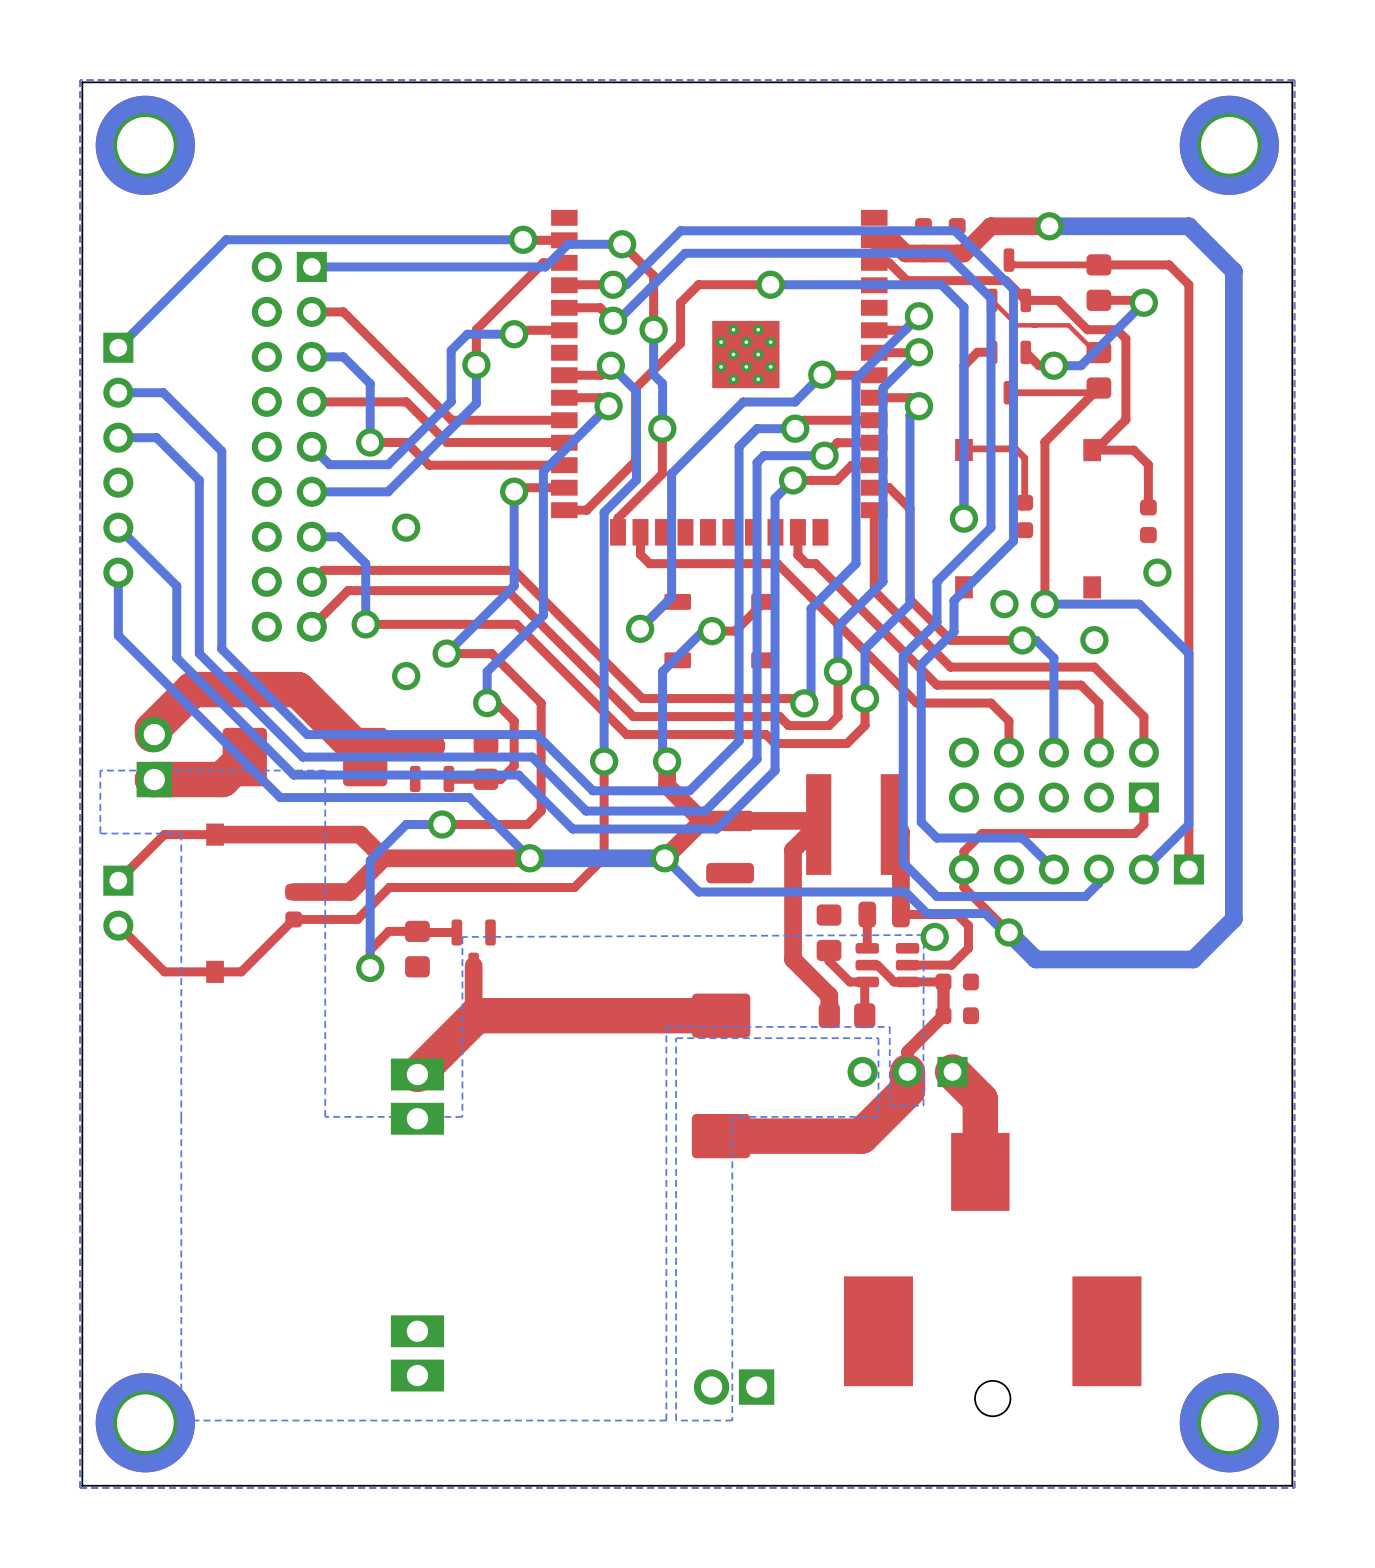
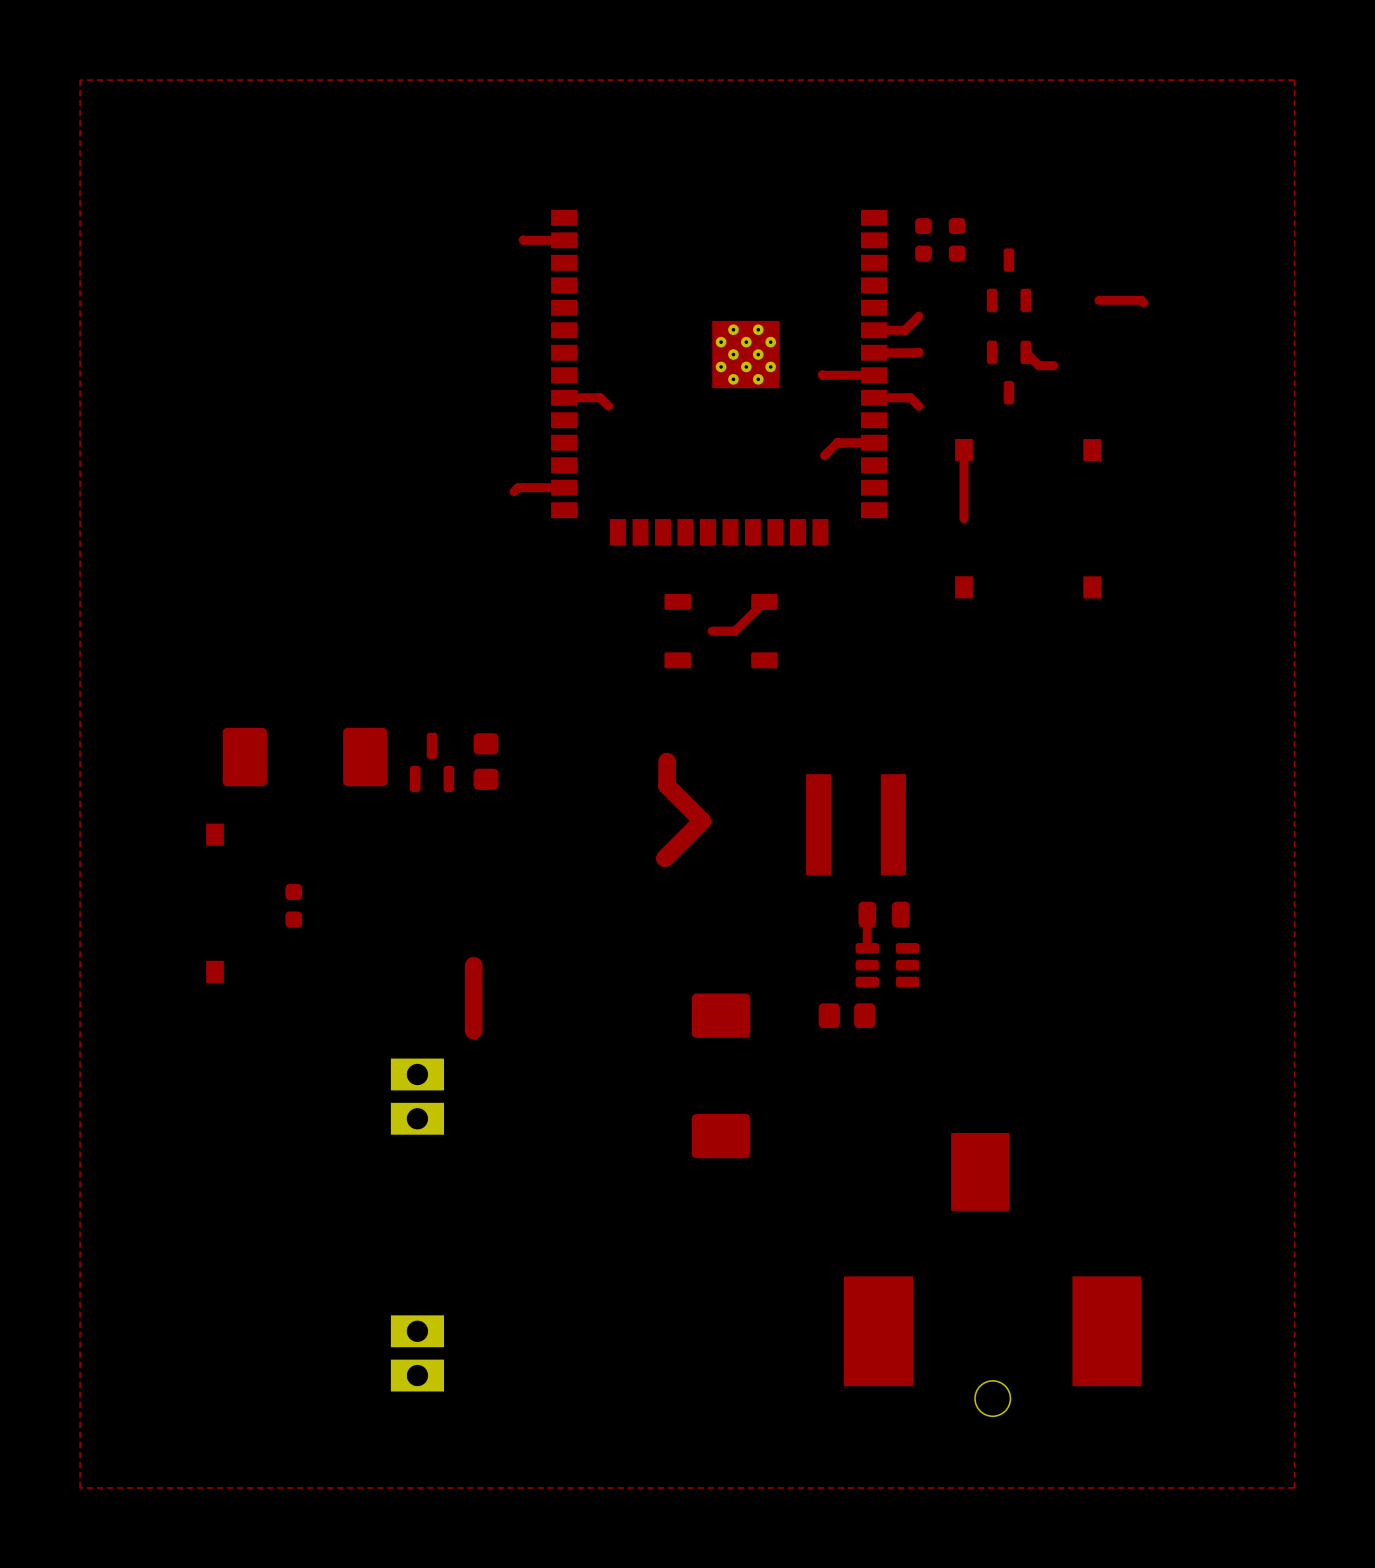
bottom zone outline: (1294, 80) (80, 80) (80, 1488) (1294, 1488) (1294, 80) -> none
board edge: (1292, 82) (82, 82) (82, 1485) (1292, 1485) (1292, 82) -> none
part: (145, 145) -> none
part: (1229, 145) -> none
top track: (1049, 226) (990, 226) (963, 253) (905, 253) (892, 240) (874, 240) -> none
bottom track: (1049, 226) (1188, 226) (1233, 271) (1233, 918) (1193, 959) (1035, 959) (1008, 932) (1004, 932) (985, 913) (927, 913) (905, 892) (698, 892) (664, 858) (529, 858) (469, 797) (280, 797) (118, 635) (118, 572) -> none
via: (1049, 226) -> none
bottom track: (523, 239) (226, 239) (118, 347) -> none
via: (523, 239) -> none
top track: (622, 244) (653, 275) (653, 329) -> none
bottom track: (622, 244) (568, 244) (545, 266) (311, 266) -> none
via: (622, 244) -> none
top track: (1008, 260) (1013, 264) (1169, 264) (1188, 284) (1188, 869) -> none
top track: (564, 262) (543, 262) (476, 329) (476, 364) -> none
top track: (874, 262) (889, 262) (906, 280) (1006, 280) (1025, 300) (1058, 300) (1087, 329) (1116, 329) (1125, 338) (1125, 419) (1095, 450) -> none
part: (1098, 282) -> none
top track: (613, 284) (564, 285) -> none
bottom track: (613, 284) (626, 284) (680, 230) (954, 230) (1013, 289) (1013, 541) (954, 600) (954, 631) (921, 664) (921, 822) (936, 838) (1022, 838) (1053, 869) -> none
via: (613, 284) -> none
top track: (770, 284) (698, 284) (680, 302) (680, 343) (635, 388) (635, 461) (586, 510) (564, 510) -> none
bottom track: (770, 284) (941, 284) (963, 307) (963, 518) -> none
via: (770, 284) -> none
top track: (992, 300) (1017, 325) (1068, 325) (1095, 352) (1098, 352) -> none
bottom track: (1143, 302) (1080, 365) (1053, 365) -> none
via: (1143, 302) -> none
top track: (564, 307) (600, 307) (613, 320) -> none
top track: (311, 311) (343, 311) (451, 420) (564, 420) -> none
bottom track: (918, 316) (856, 379) (856, 563) (811, 608) (811, 696) (804, 703) -> none
via: (918, 316) -> none
bottom track: (613, 320) (617, 320) (685, 253) (945, 253) (990, 298) (990, 527) (936, 581) (936, 622) (903, 655) (903, 862) (936, 896) (1085, 896) (1098, 883) (1098, 869) -> none
via: (613, 320) -> none
bottom track: (653, 329) (653, 374) (662, 383) (662, 428) -> none
via: (653, 329) -> none
top track: (564, 330) (518, 330) (514, 334) -> none
bottom track: (514, 334) (467, 334) (451, 350) (451, 401) (388, 464) (329, 464) (311, 446) -> none
via: (514, 334) -> none
bottom track: (918, 352) (883, 388) (883, 581) (838, 626) (838, 671) -> none
via: (918, 352) -> none
top track: (990, 352) (977, 352) (963, 365) (963, 444) (968, 448) (1015, 448) (1024, 458) (1024, 502) -> none
bottom track: (311, 356) (343, 356) (370, 383) (370, 442) -> none
bottom track: (476, 364) (476, 403) (388, 491) (311, 491) -> none
via: (476, 364) -> none
top track: (610, 365) (601, 375) (564, 375) -> none
bottom track: (610, 365) (636, 391) (636, 479) (604, 512) (604, 761) -> none
via: (610, 365) -> none
via: (1053, 365) -> none
part: (1098, 370) -> none
bottom track: (822, 374) (795, 401) (743, 401) (671, 473) (671, 597) (640, 628) -> none
via: (822, 374) -> none
bottom track: (118, 392) (163, 392) (221, 451) (221, 649) (307, 734) (536, 734) (592, 790) (689, 790) (739, 741) (739, 446) (757, 428) (795, 428) -> none
top track: (1008, 392) (1094, 392) (1098, 388) (1044, 442) (1044, 604) -> none
top track: (311, 401) (406, 401) (446, 442) (564, 442) -> none
bottom track: (608, 406) (543, 471) (543, 615) (487, 671) (487, 703) -> none
via: (608, 406) -> none
bottom track: (918, 406) (909, 415) (909, 604) (865, 649) (865, 698) -> none
via: (918, 406) -> none
top track: (874, 420) (803, 420) (795, 428) -> none
top track: (662, 428) (662, 473) (618, 518) (618, 532) -> none
via: (662, 428) -> none
via: (795, 428) -> none
bottom track: (118, 437) (156, 437) (199, 480) (199, 653) (302, 757) (532, 757) (586, 811) (705, 811) (757, 759) (757, 462) (763, 455) (824, 455) -> none
top track: (370, 442) (406, 442) (429, 465) (564, 465) -> none
via: (370, 442) -> none
part: (289, 446) -> none
top track: (1092, 450) (1133, 450) (1148, 464) (1148, 507) -> none
via: (824, 455) -> none
part: (118, 460) -> none
top track: (874, 465) (851, 465) (836, 480) (793, 480) -> none
bottom track: (793, 480) (775, 498) (775, 770) (716, 829) (572, 829) (518, 775) (293, 775) (176, 658) (176, 586) (118, 527) -> none
via: (793, 480) -> none
top track: (874, 487) (889, 487) (909, 508) (909, 599) (950, 640) (1022, 640) -> none
bottom track: (514, 491) (514, 586) (446, 653) -> none
via: (514, 491) -> none
top track: (874, 510) (874, 590) (950, 667) (1094, 667) (1143, 716) (1143, 752) -> none
part: (1024, 516) -> none
via: (963, 518) -> none
part: (1148, 521) -> none
via: (406, 527) -> none
top track: (640, 532) (640, 554) (649, 563) (777, 563) (916, 703) (990, 703) (1008, 721) (1008, 752) -> none
top track: (797, 532) (797, 555) (806, 563) (815, 563) (936, 685) (1080, 685) (1098, 703) (1098, 752) -> none
bottom track: (311, 536) (338, 536) (365, 563) (365, 624) -> none
via: (1157, 572) -> none
top track: (311, 581) (323, 570) (514, 570) (642, 698) (799, 698) (804, 703) -> none
via: (1004, 604) -> none
bottom track: (1044, 604) (1139, 604) (1188, 653) (1188, 824) (1143, 869) -> none
via: (1044, 604) -> none
top track: (365, 624) (516, 624) (626, 734) (766, 734) (775, 743) (847, 743) (865, 725) (865, 698) -> none
via: (365, 624) -> none
top track: (311, 626) (348, 590) (507, 590) (633, 716) (779, 716) (788, 725) (829, 725) (838, 716) (838, 671) -> none
via: (640, 628) -> none
bottom track: (712, 631) (703, 631) (662, 671) (662, 757) (667, 761) -> none
via: (712, 631) -> none
bottom track: (1022, 640) (1036, 640) (1053, 658) (1053, 752) -> none
via: (1022, 640) -> none
via: (1094, 640) -> none
top track: (446, 653) (491, 653) (541, 703) (541, 811) (527, 824) (442, 824) -> none
via: (446, 653) -> none
via: (838, 671) -> none
via: (406, 676) -> none
via: (865, 698) -> none
top track: (487, 703) (496, 703) (514, 721) (514, 766) (500, 779) (449, 779) -> none
via: (487, 703) -> none
via: (804, 703) -> none
top track: (152, 734) (152, 729) (192, 689) (297, 689) (365, 757) (376, 745) (432, 745) -> none
part: (154, 757) -> none
top track: (244, 757) (222, 779) (152, 779) -> none
top track: (604, 761) (604, 857) (574, 887) (389, 887) (357, 919) (293, 919) (241, 971) (164, 971) (118, 925) (113, 925) -> none
via: (604, 761) -> none
via: (667, 761) -> none
bottom zone outline: (325, 770) (325, 1116) (462, 1116) (462, 936) (923, 935) (923, 1105) (889, 1105) (889, 1026) (666, 1026) (666, 1420) (181, 1420) (181, 833) (100, 833) (100, 770) (325, 770) -> none
part: (1053, 775) -> none
top track: (1143, 797) (1143, 824) (1134, 833) (981, 833) (963, 851) (963, 887) (1008, 932) -> none
top track: (754, 820) (815, 820) (818, 824) (793, 850) (793, 959) (829, 995) (829, 1015) -> none
bottom track: (442, 824) (406, 824) (370, 860) (370, 950) -> none
via: (442, 824) -> none
top track: (893, 824) (900, 832) (900, 914) (957, 914) (968, 925) (968, 948) (951, 965) (907, 965) -> none
part: (730, 847) -> none
top track: (383, 858) (349, 892) (293, 892) -> none
top track: (383, 858) (360, 834) (164, 834) (118, 880) (113, 880) -> none
top track: (529, 858) (383, 858) -> none
via: (529, 858) -> none
via: (664, 858) -> none
part: (1076, 869) -> none
part: (118, 903) -> none
top track: (456, 932) (388, 931) (370, 949) (370, 967) -> none
part: (829, 932) -> none
via: (1008, 932) -> none
via: (934, 936) -> none
part: (417, 949) -> none
part: (473, 949) -> none
top track: (829, 950) (829, 961) (849, 981) (867, 981) (864, 984) (864, 1015) -> none
top track: (867, 965) (877, 965) (894, 981) (943, 981) (943, 1015) (907, 1051) (907, 1090) (861, 1136) (721, 1136) -> none
via: (370, 967) -> none
part: (957, 981) -> none
top track: (476, 1015) (417, 1074) -> none
top track: (721, 1015) (476, 1015) -> none
part: (957, 1015) -> none
bottom zone outline: (878, 1038) (878, 1116) (732, 1116) (732, 1420) (676, 1420) (676, 1038) (878, 1038) -> none
part: (907, 1071) -> none
top track: (952, 1071) (980, 1099) (980, 1171) -> none
part: (734, 1387) -> none
part: (145, 1422) -> none
part: (1229, 1422) -> none

